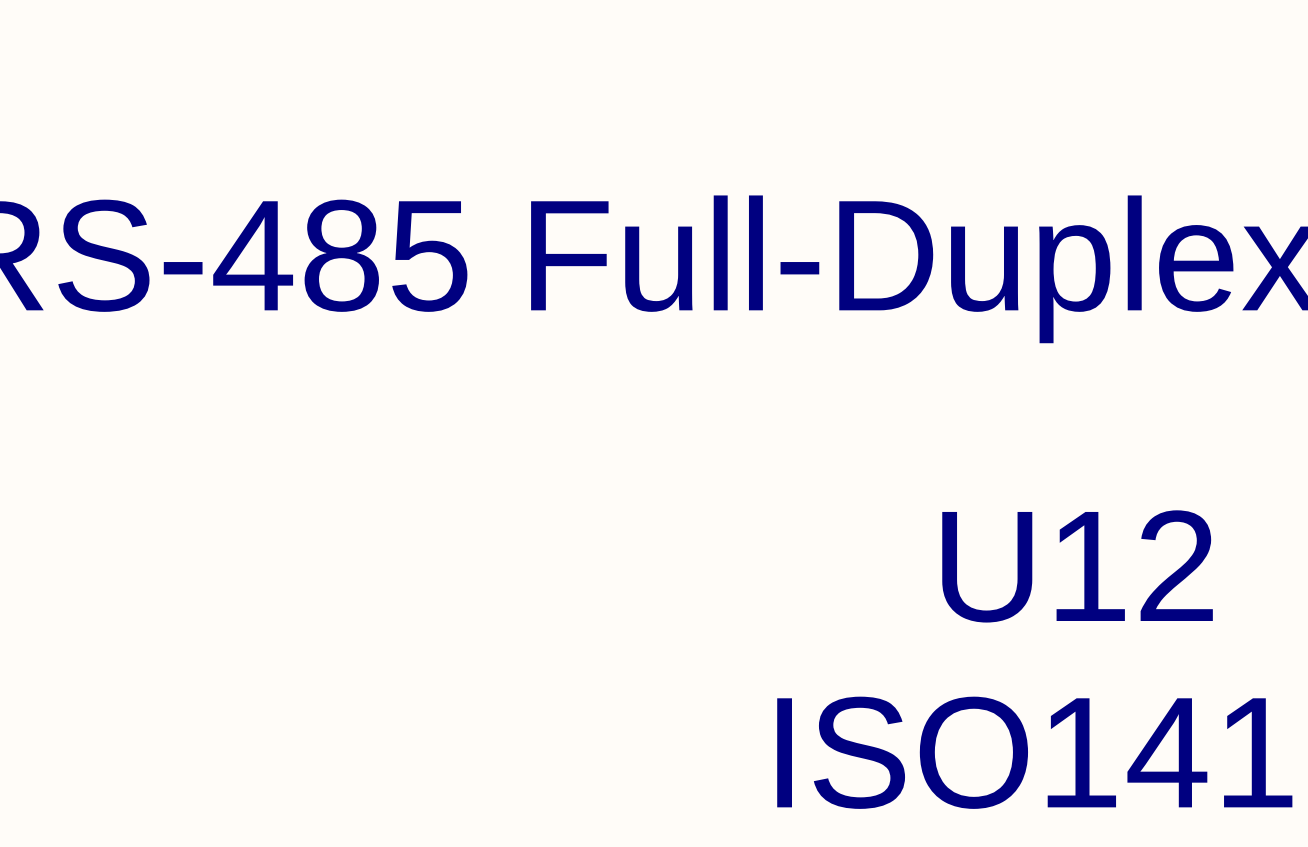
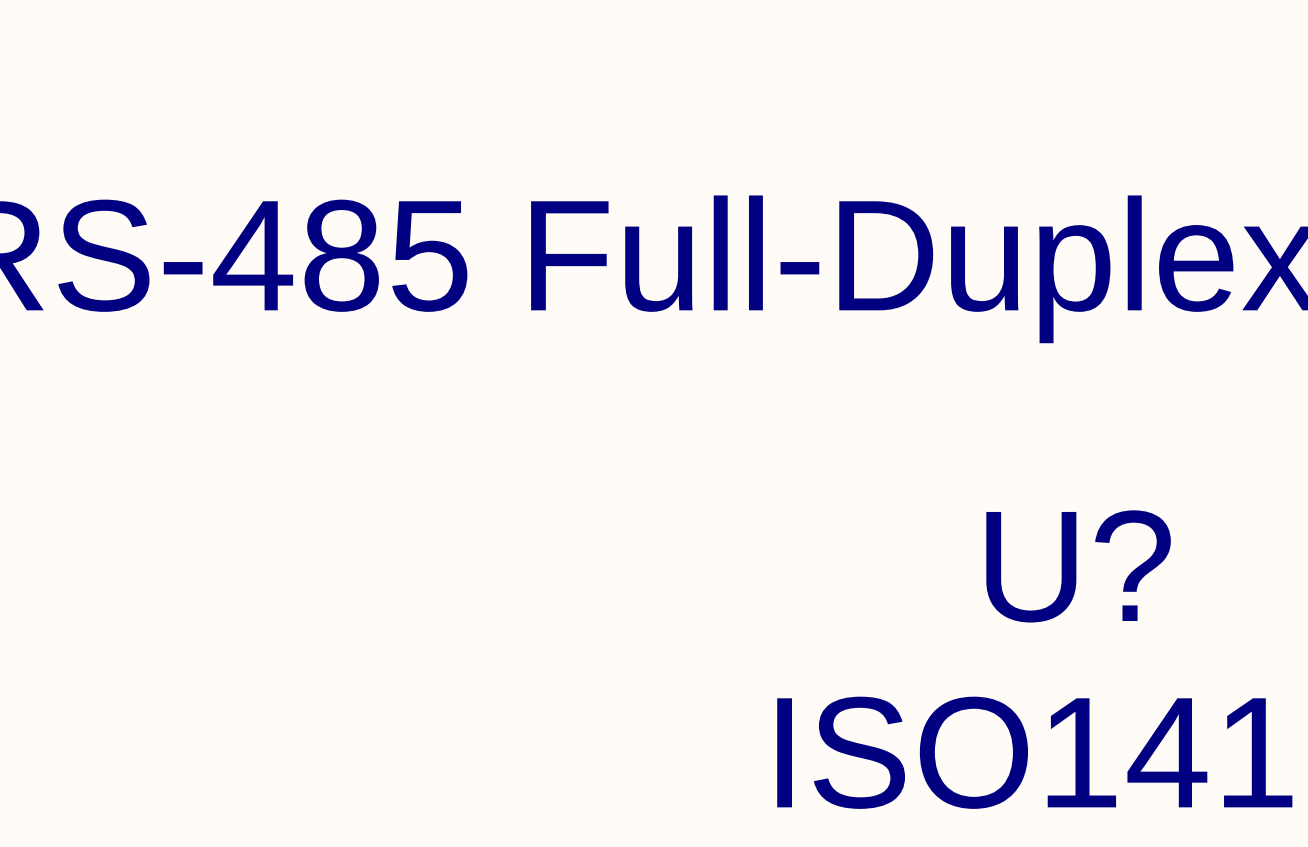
U12 name: U12 (1077, 566) -> U? (1078, 566)

